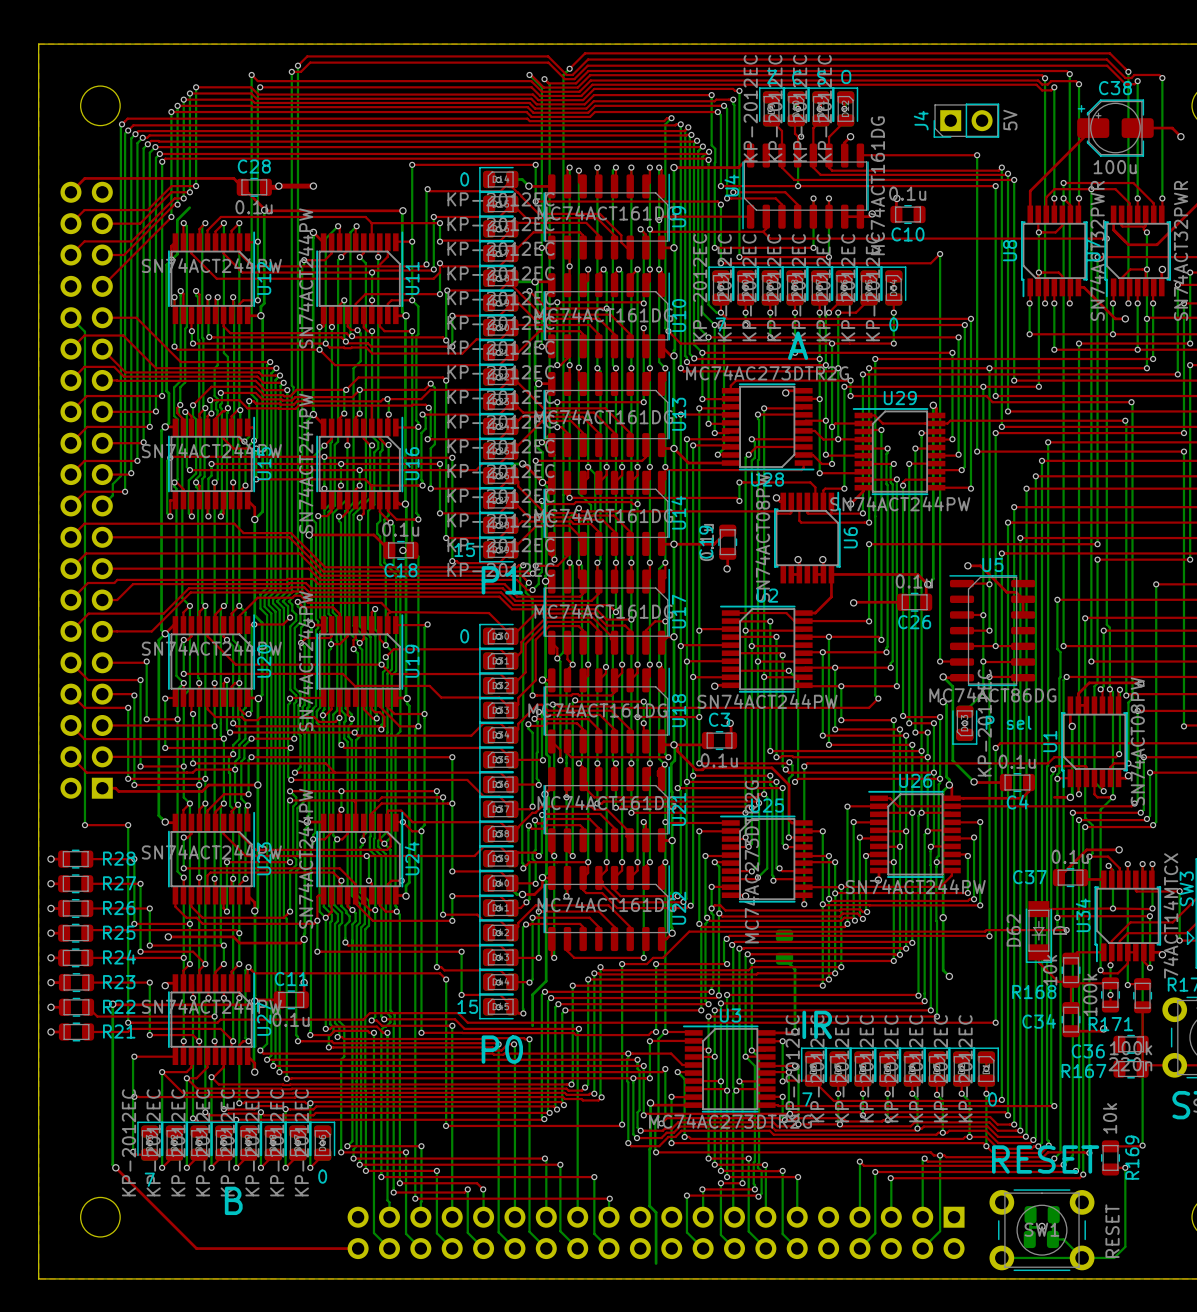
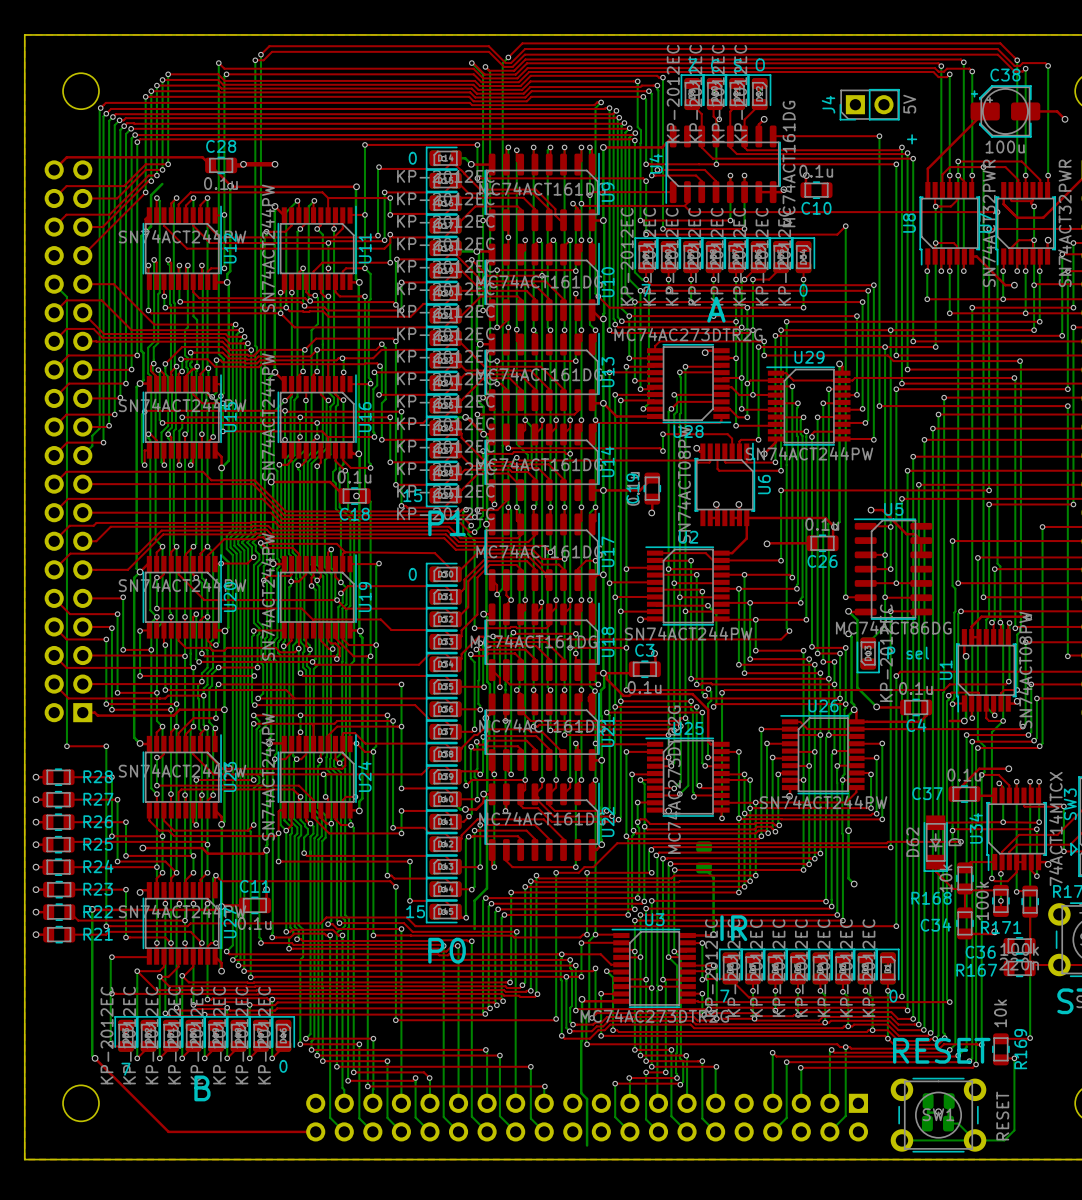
text: none -> + (912, 139)

